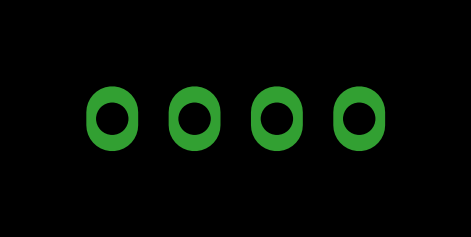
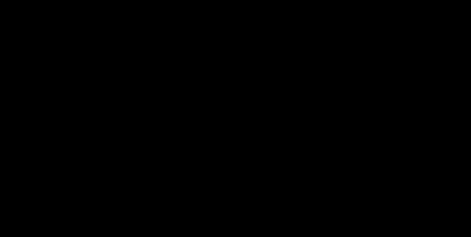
part: (235, 118) -> none

